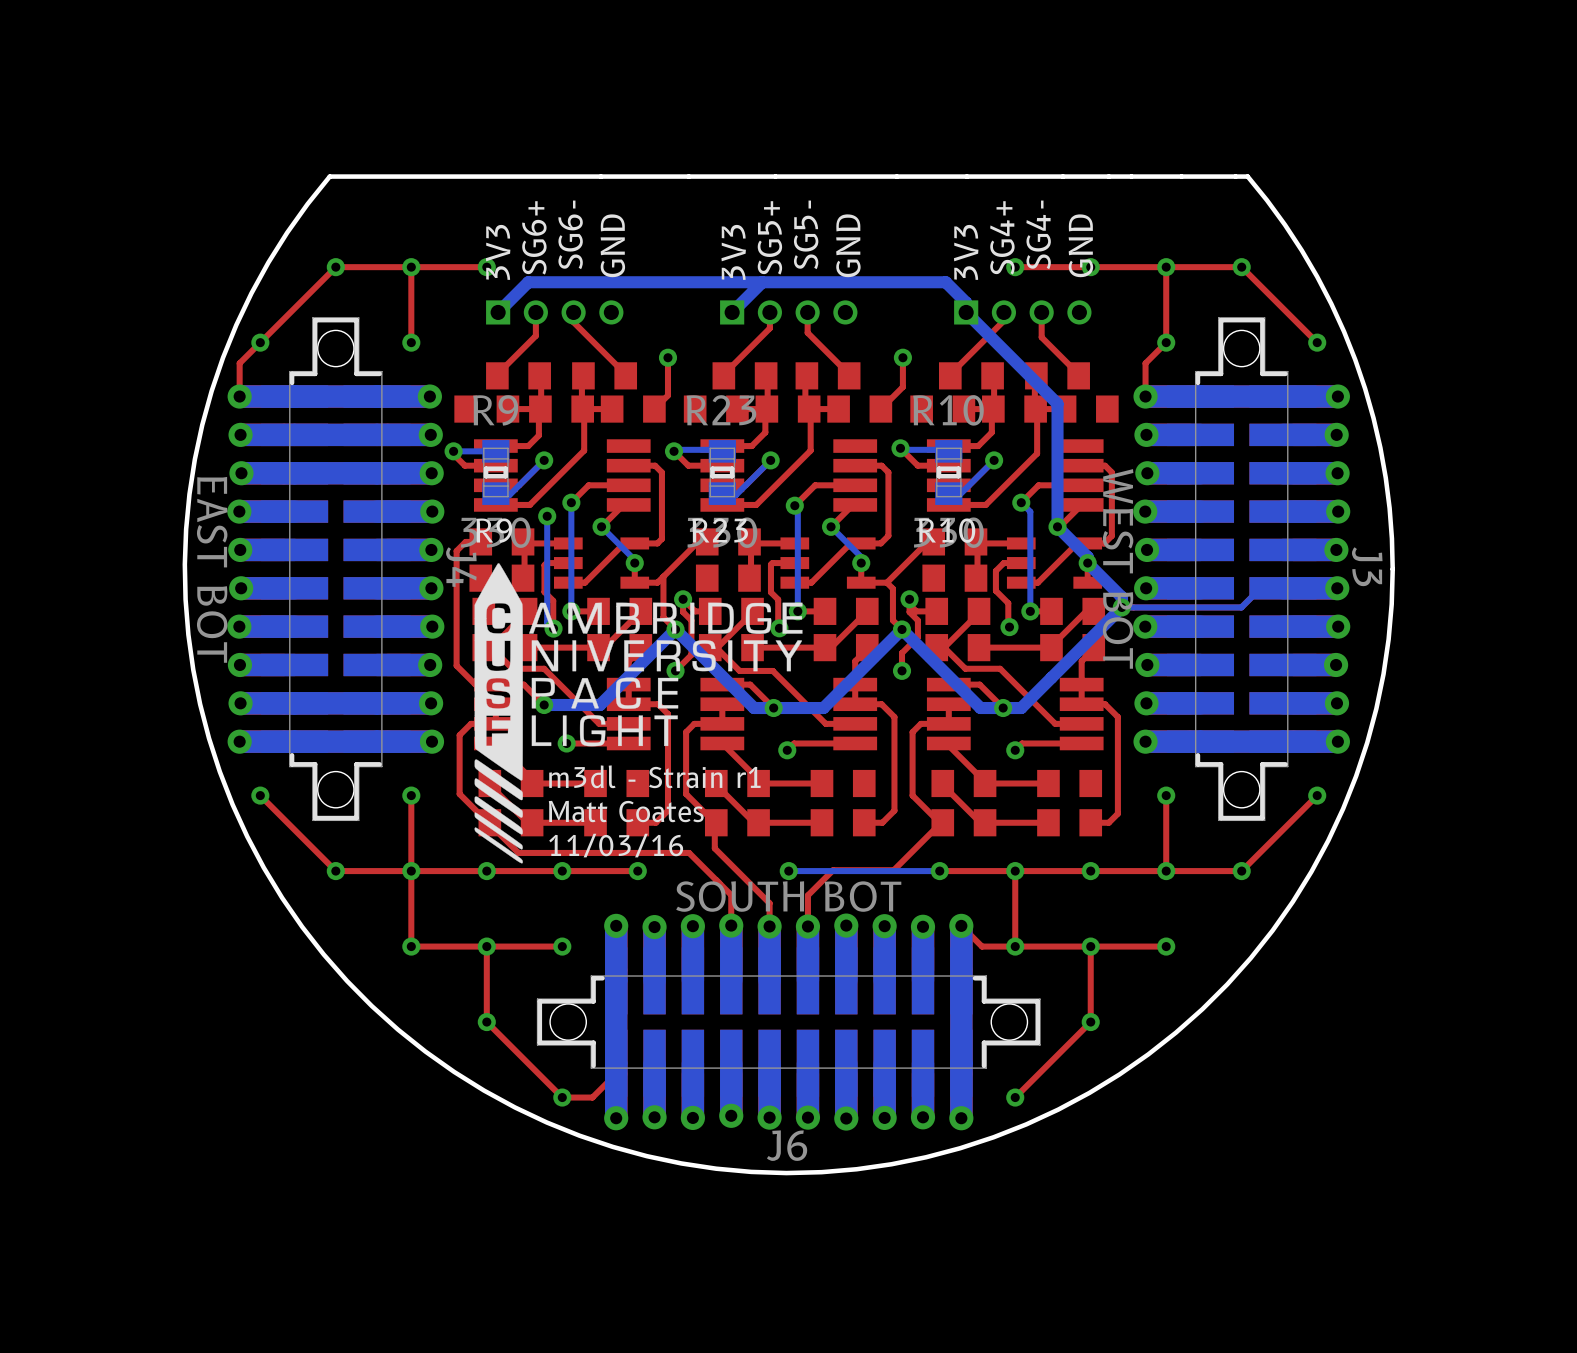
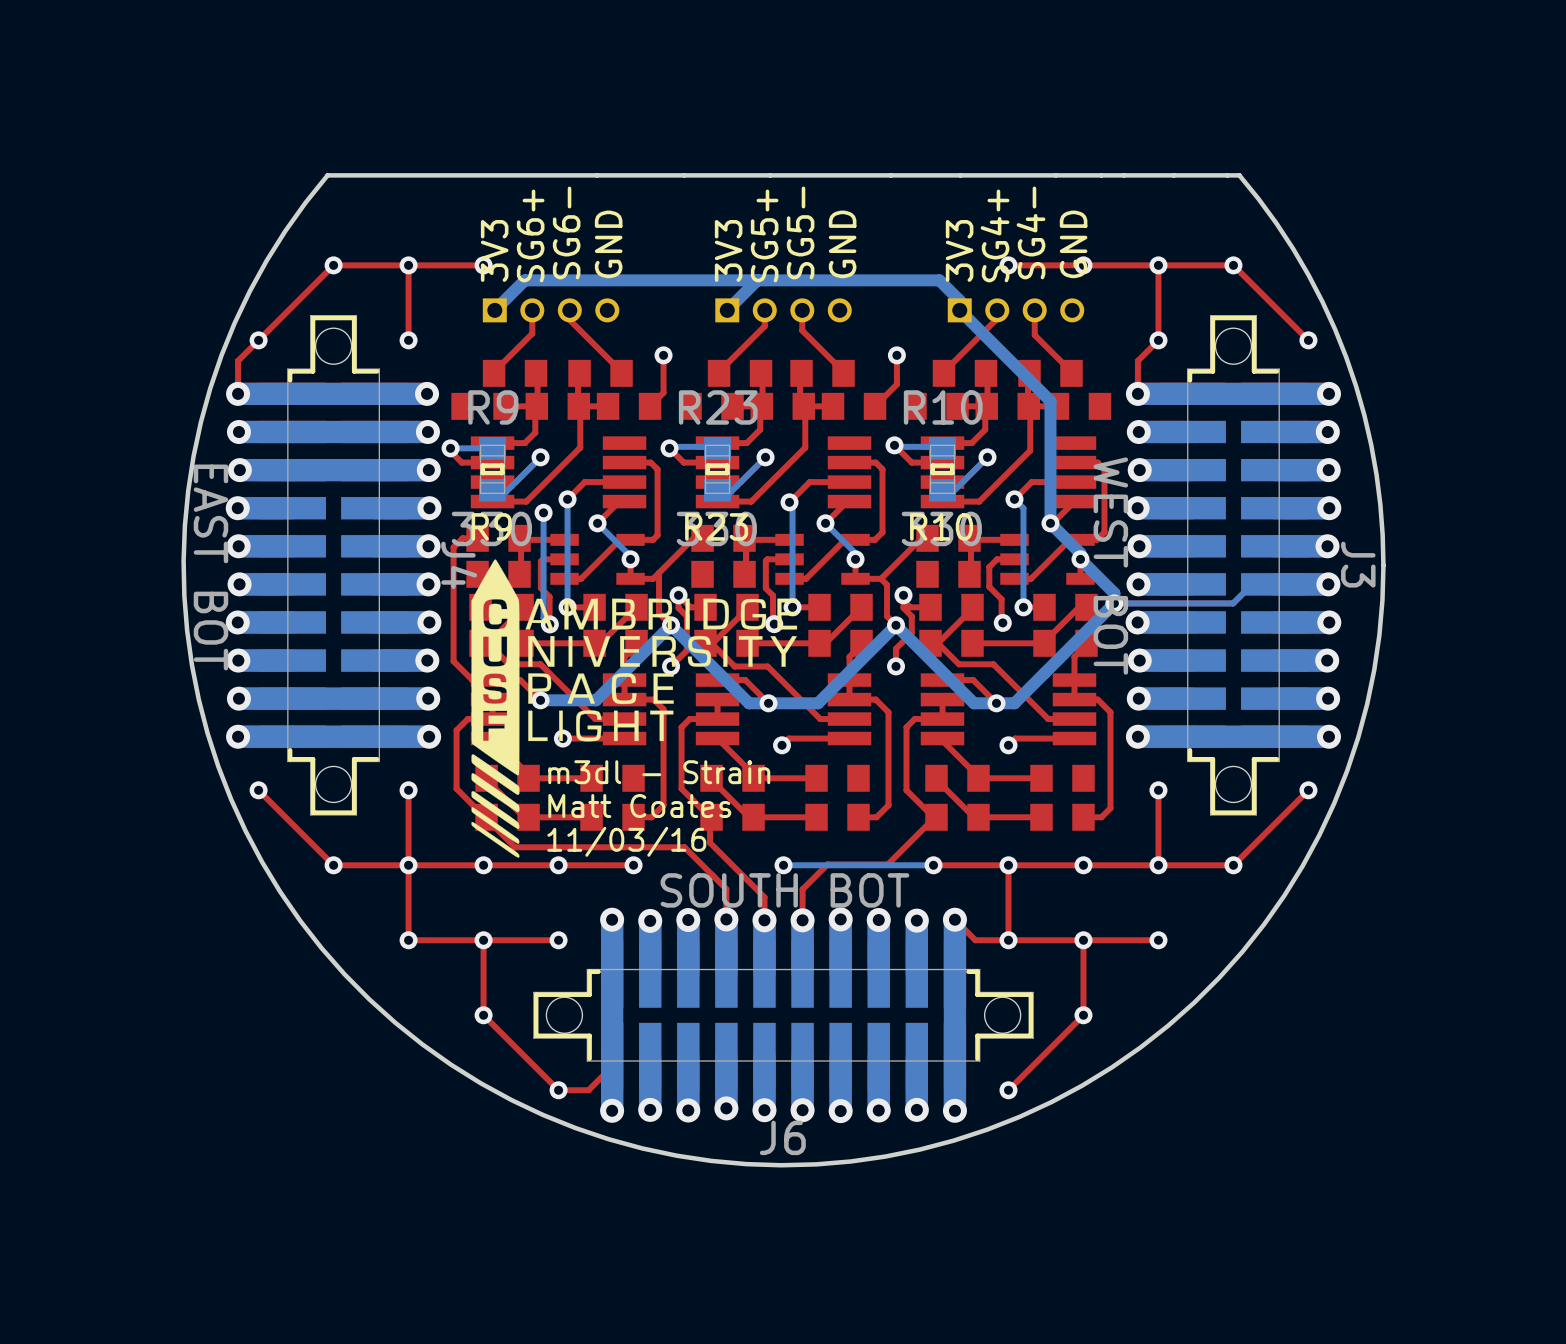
text: m3dl - Strain r1 (654, 776) -> m3dl - Strain (659, 772)

